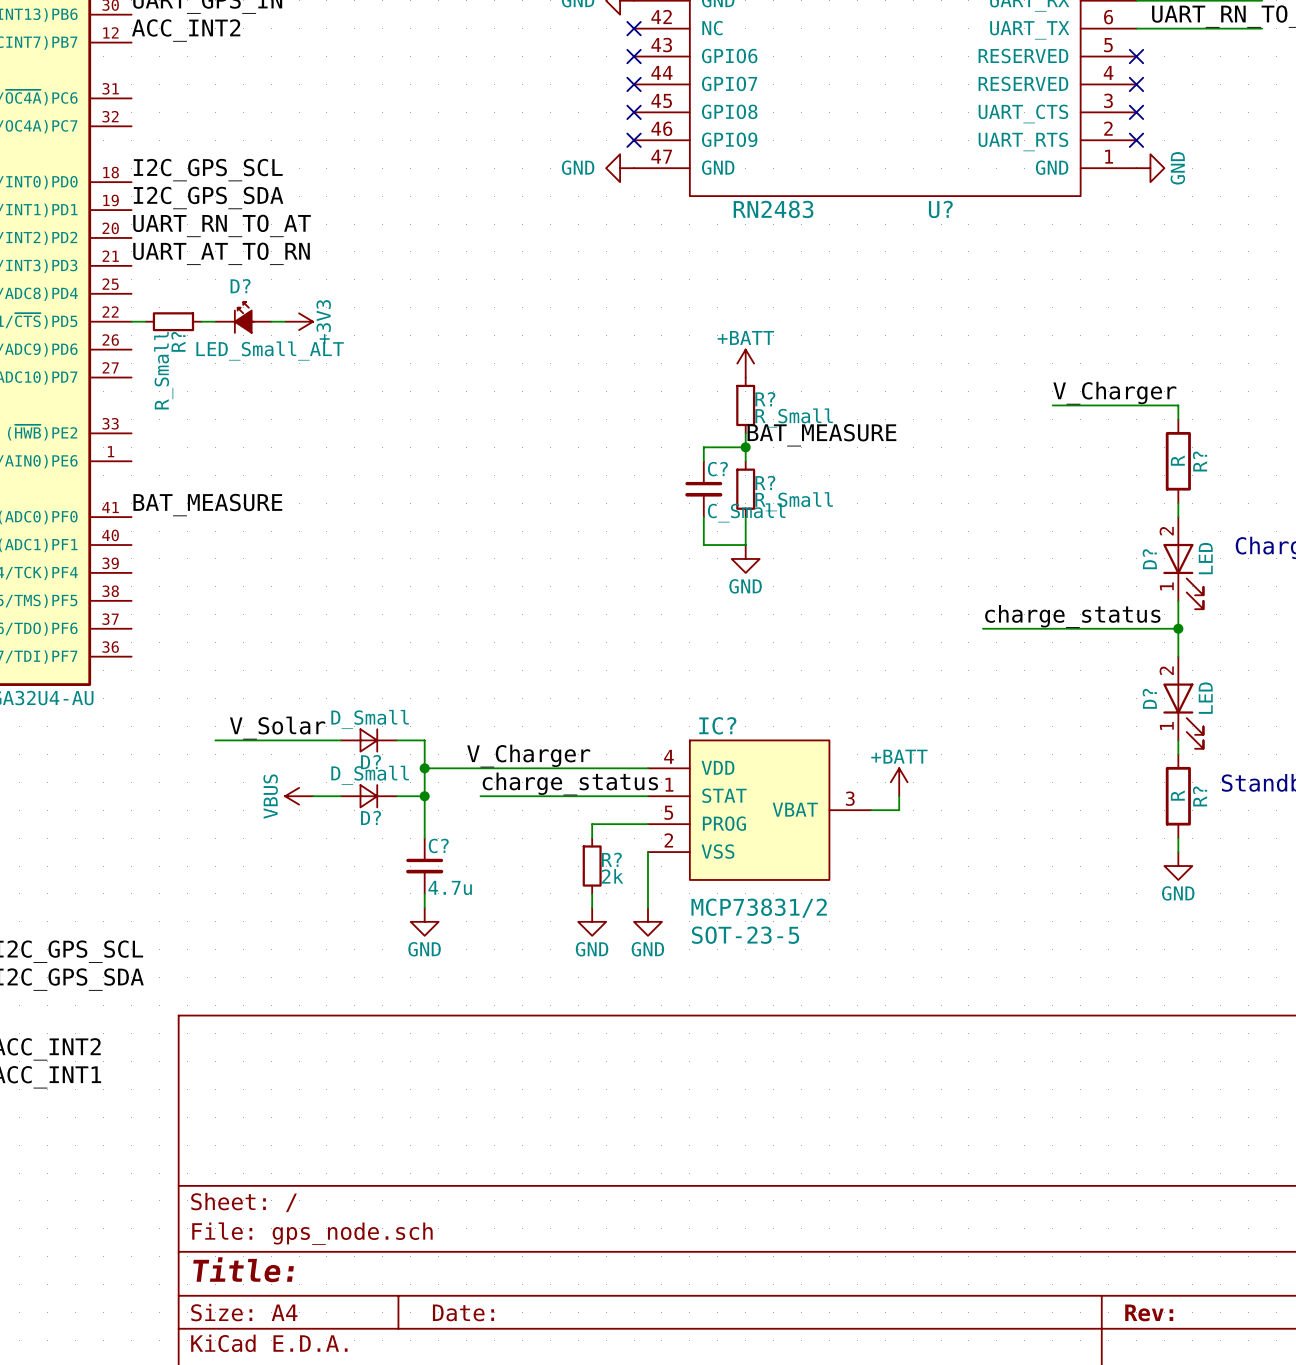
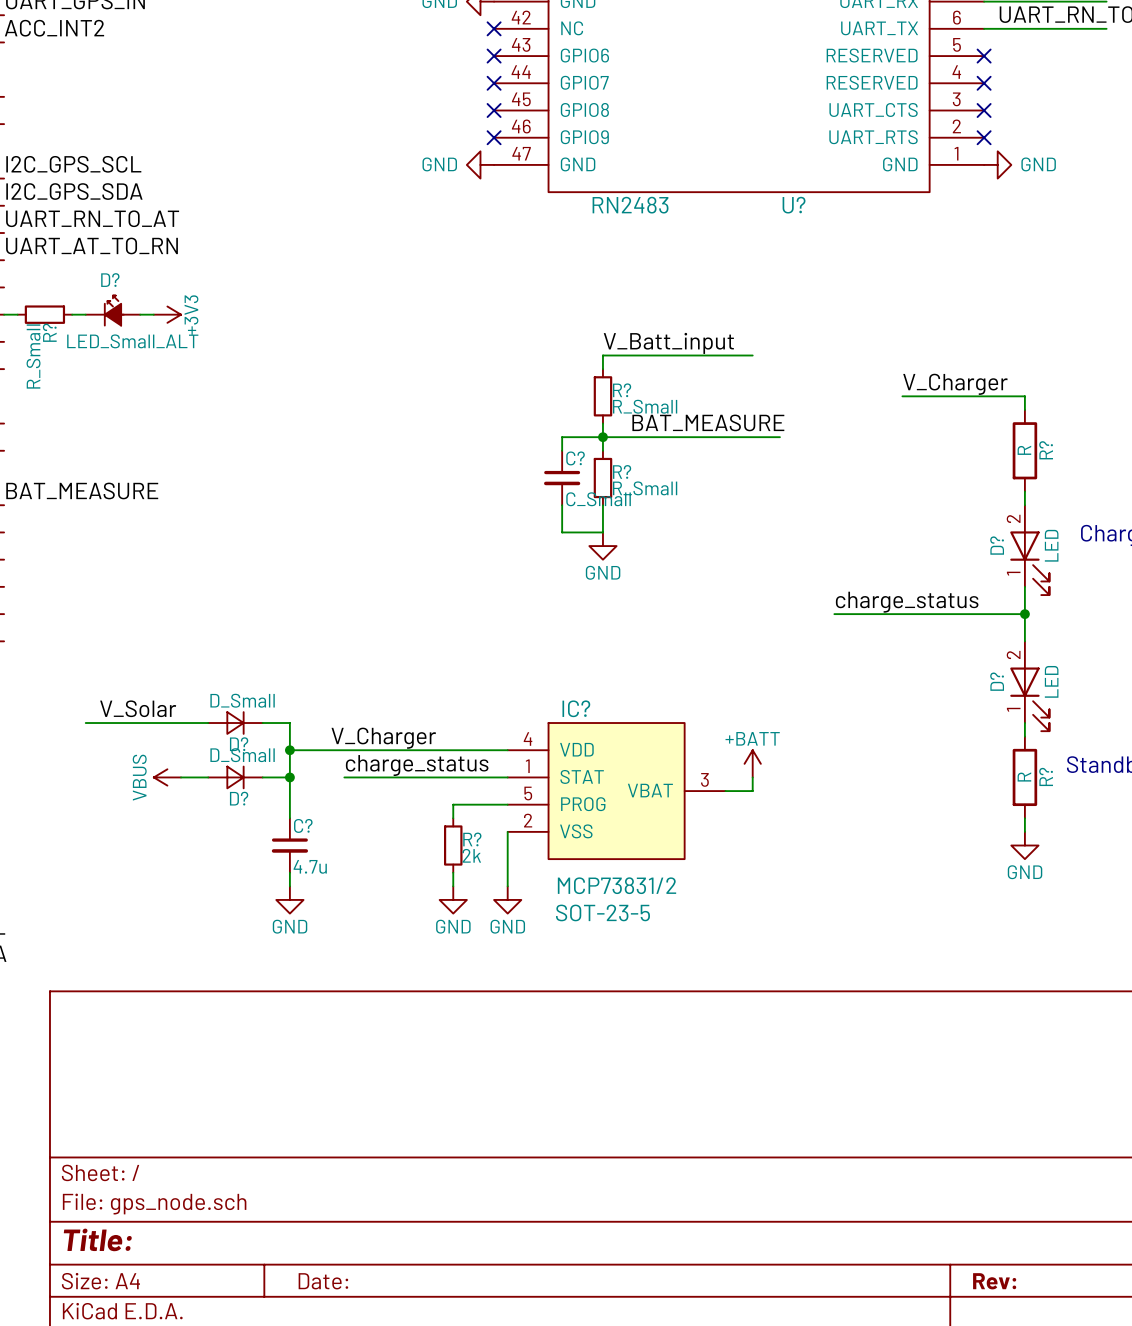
power symbol text rotation: 0° (1177, 168) -> 90° clockwise (1038, 164)
label: none -> V_Batt_input (668, 343)
power symbol: +BATT (745, 363) -> none
wire: none -> (752, 355) (602, 355) (602, 369)
label position: BAT_MEASURE (821, 435) -> BAT_MEASURE (708, 422)
wire: none -> (602, 437) (779, 437)

